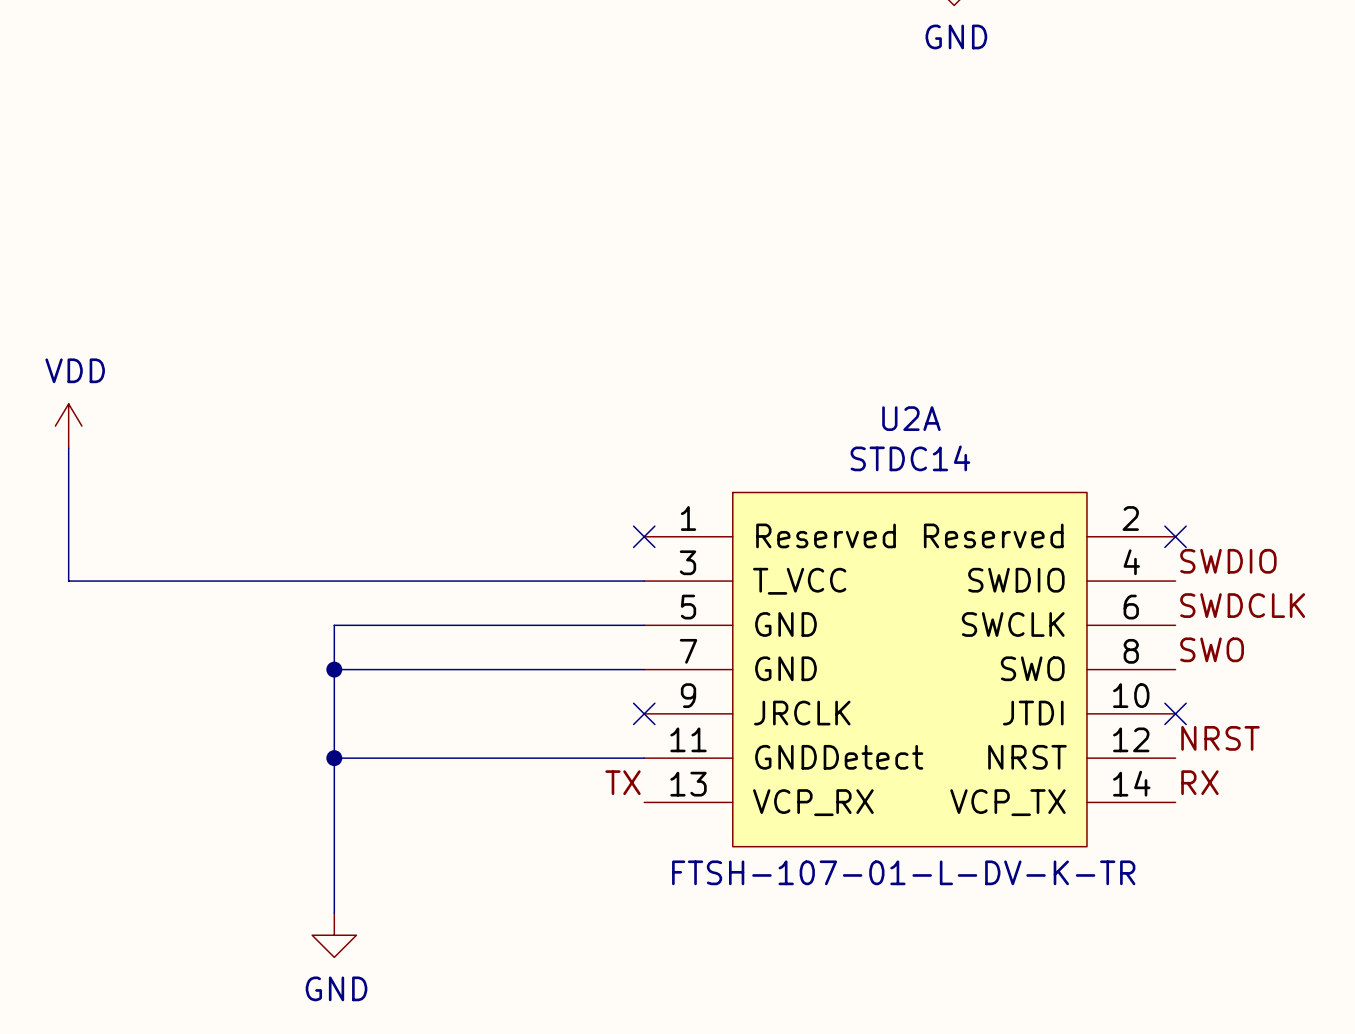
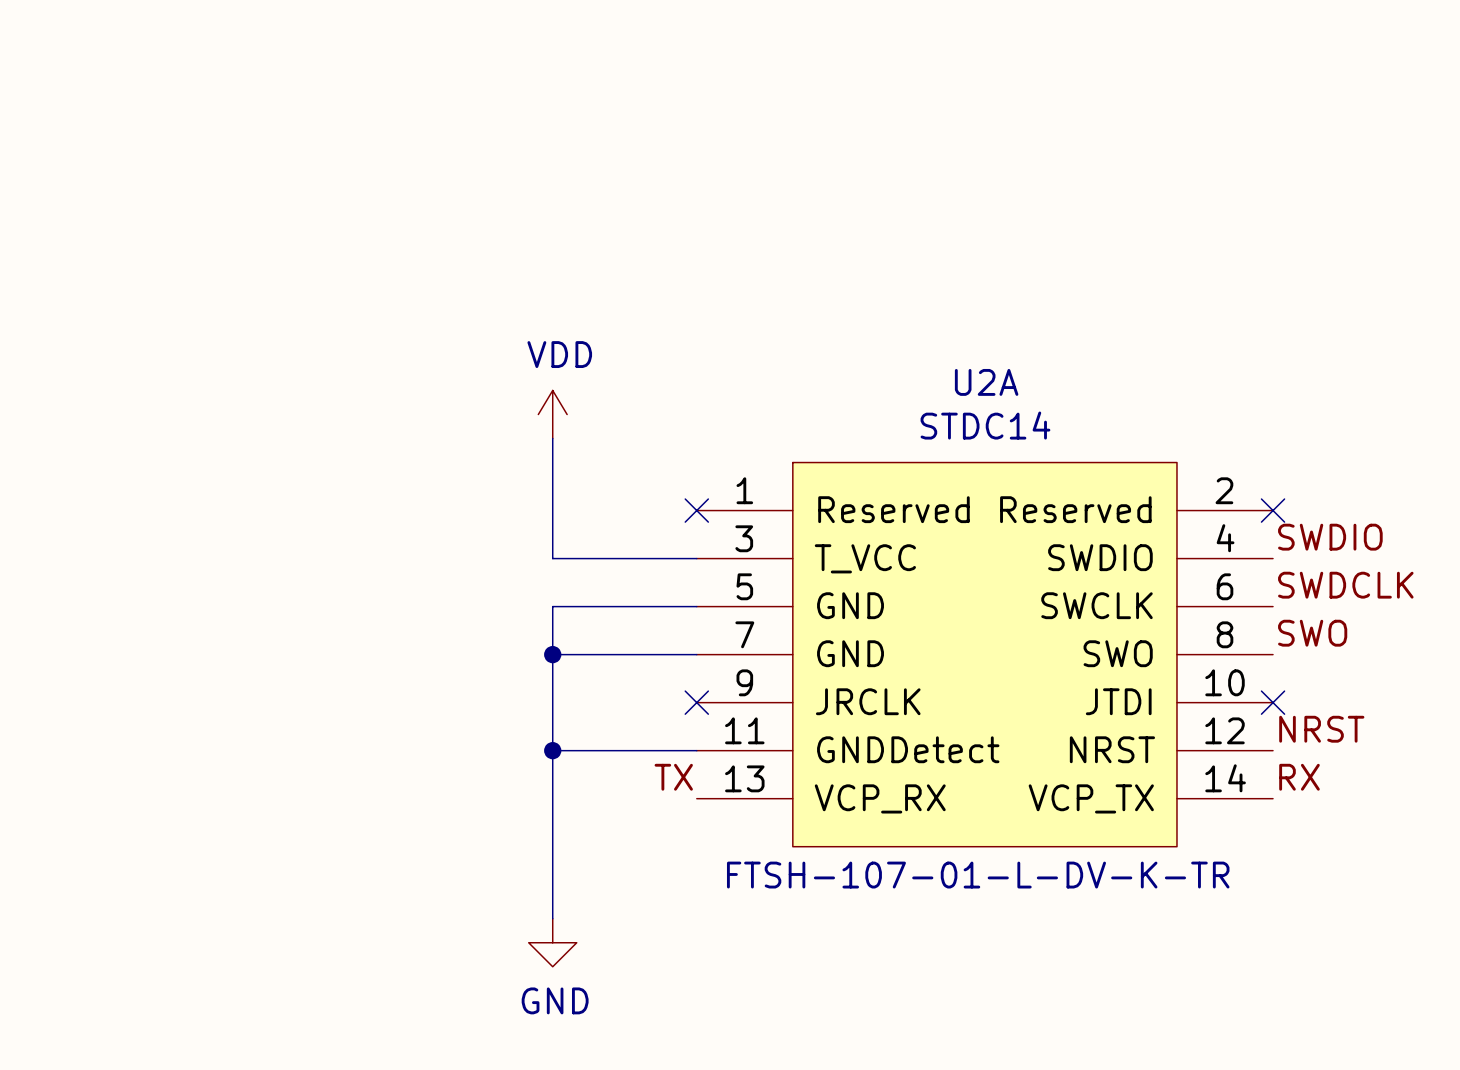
power symbol: VDD (68, 426) -> none
wire: (68, 448) (68, 581) (511, 581) -> (552, 438) (552, 558)
power symbol: none -> VDD (552, 414)
wire: (511, 625) (334, 625) (334, 913) -> (552, 606) (552, 918)
wire: (334, 669) (511, 669) -> none
junction: (334, 669) -> none
junction: none -> (552, 654)
wire: (334, 758) (511, 758) -> none
junction: (334, 758) -> none
junction: none -> (552, 750)
power symbol position: GND (334, 935) -> GND (552, 942)

